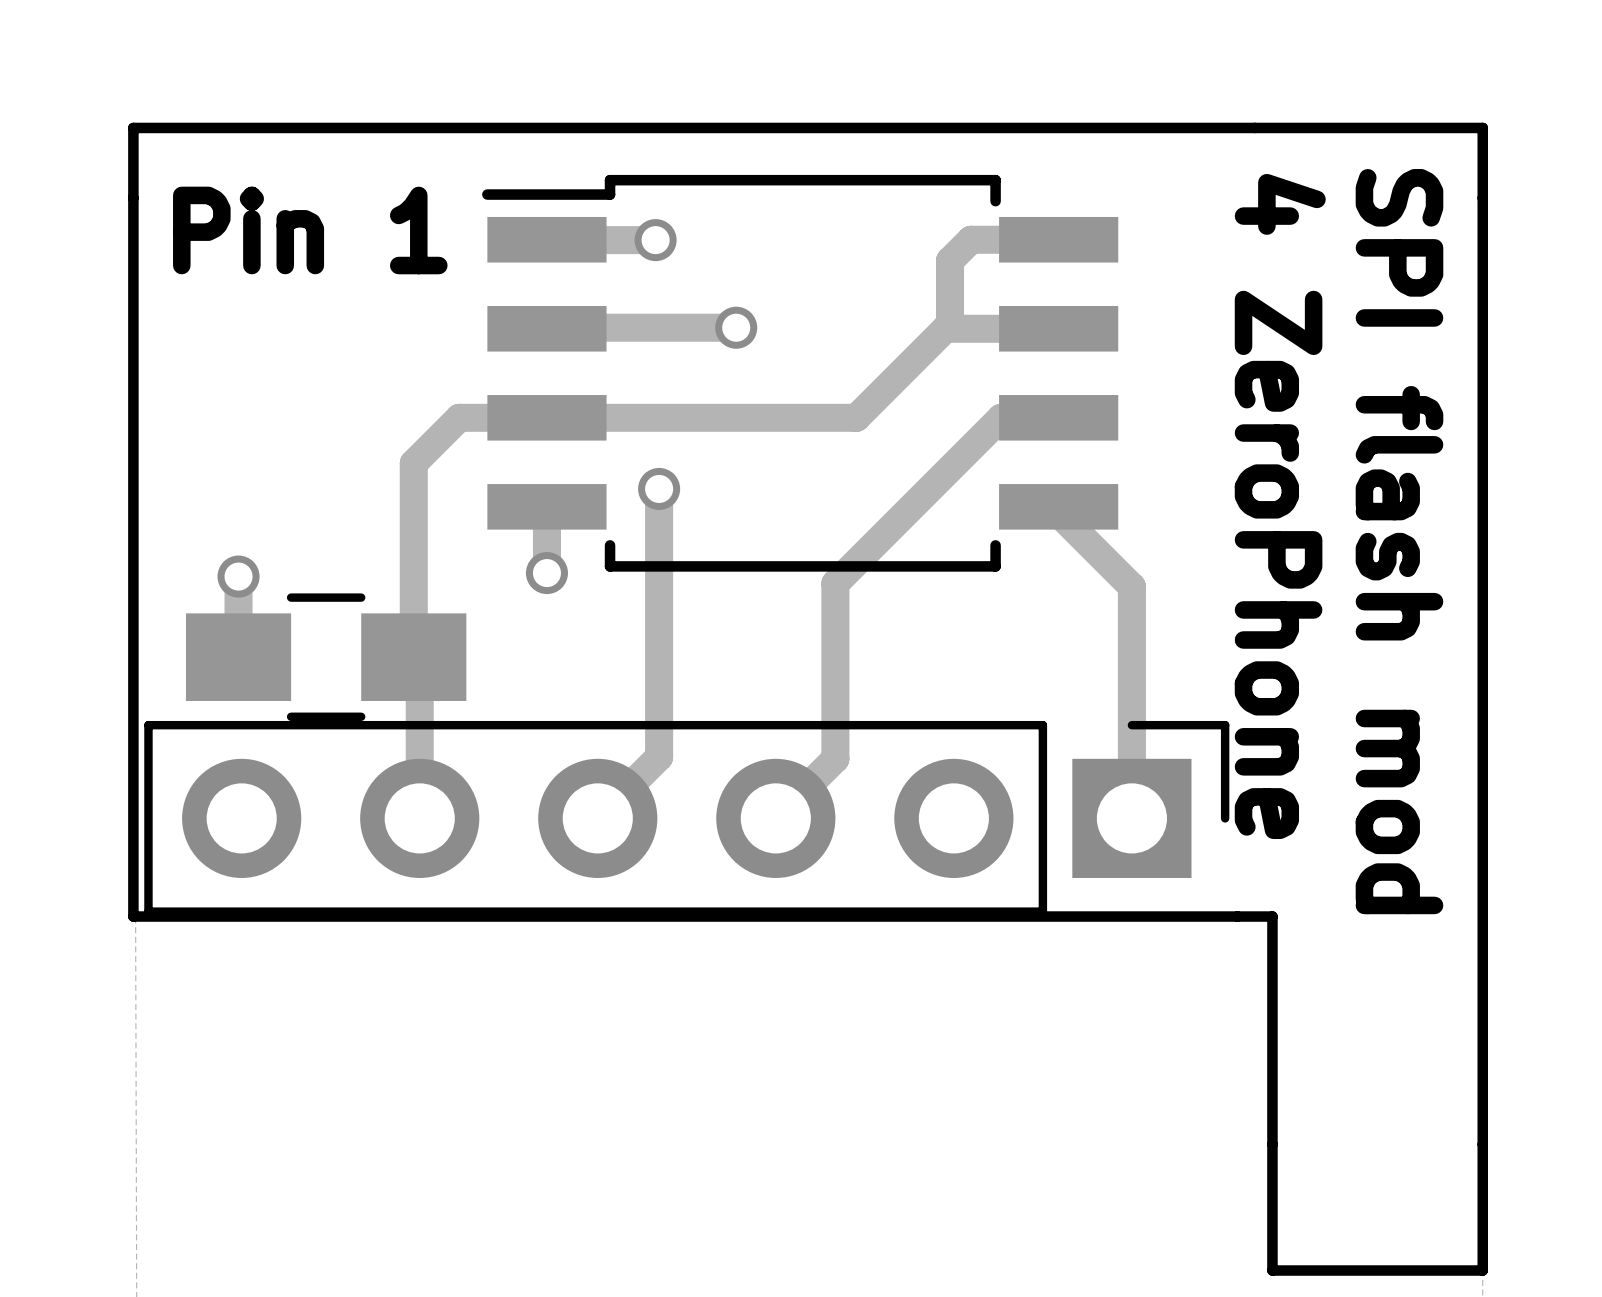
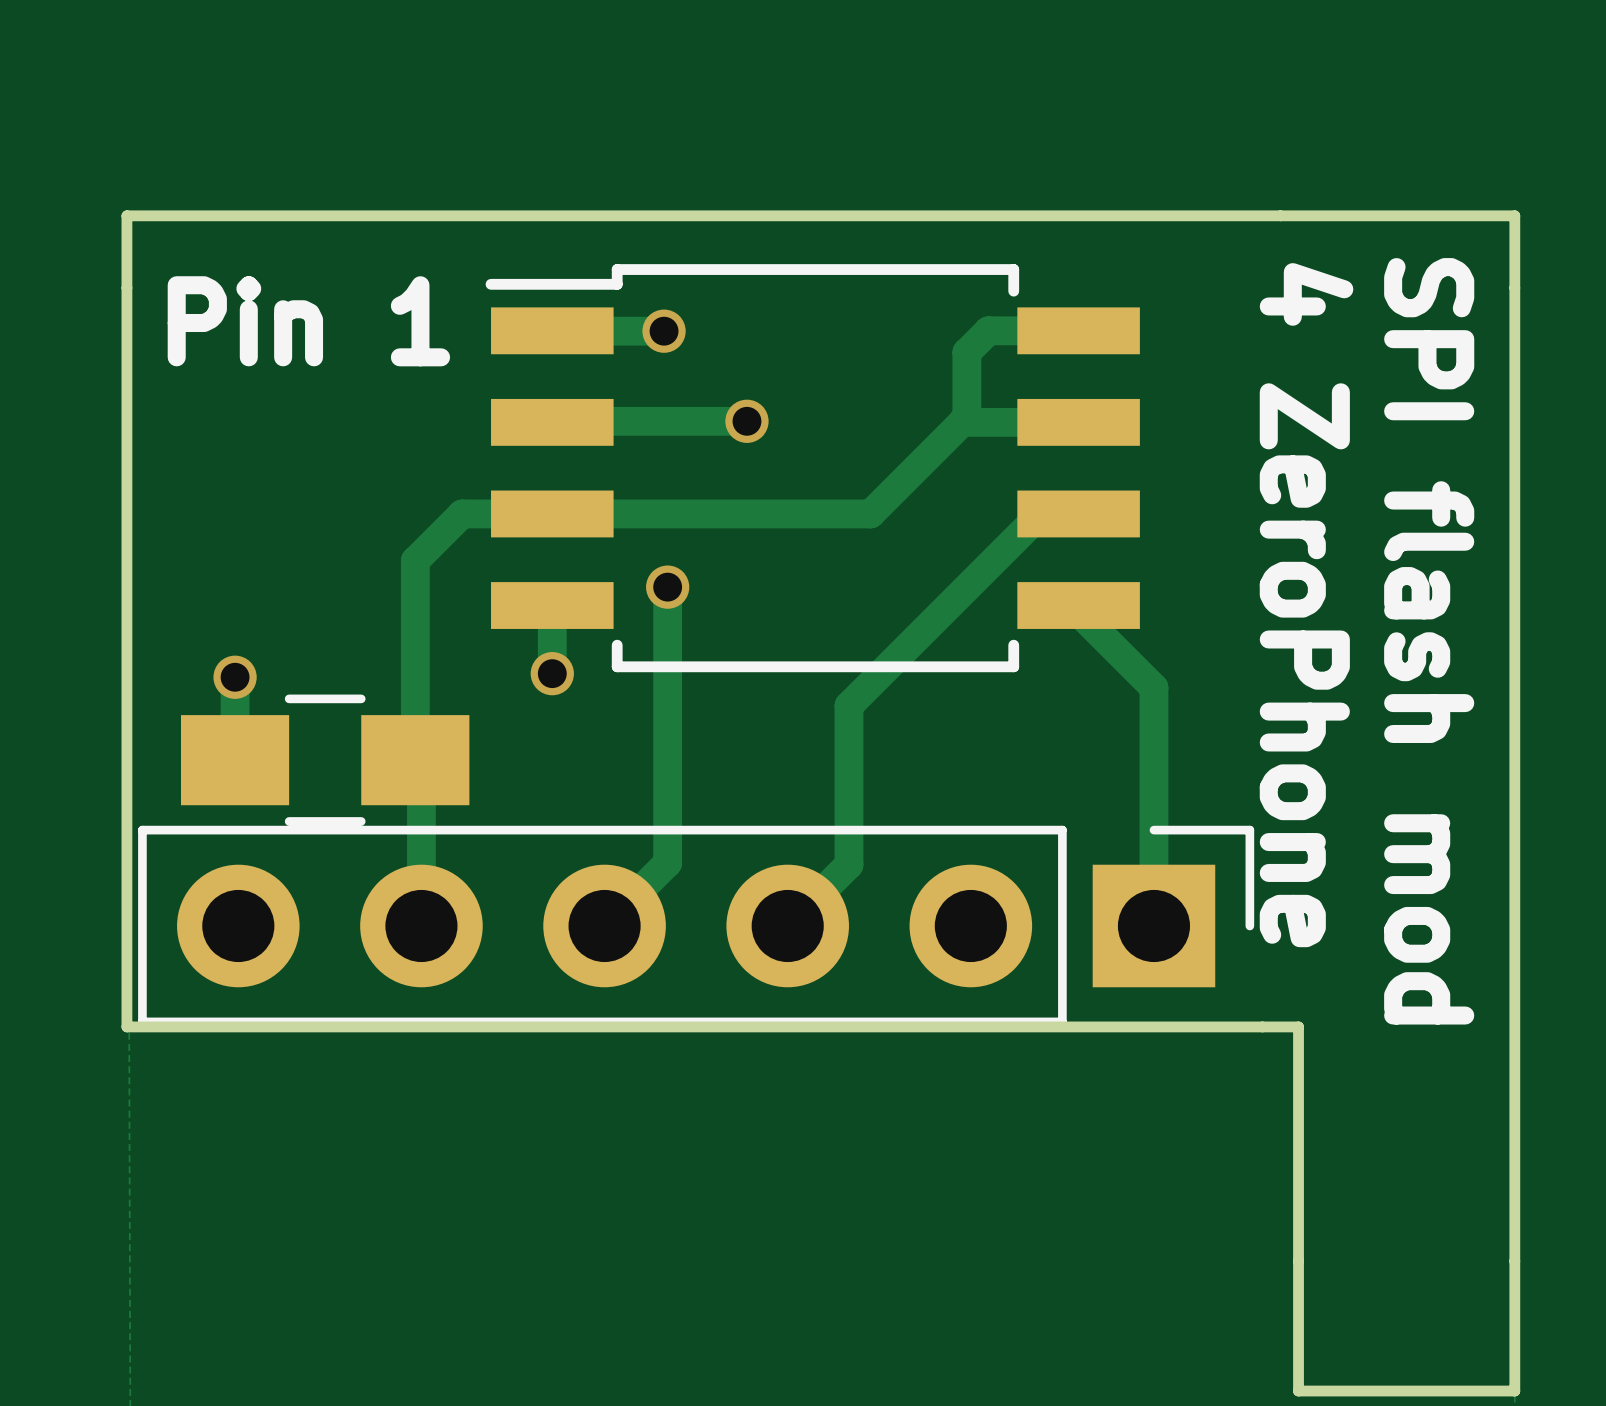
track: (1021, 417) (1001, 417) (835, 583) (835, 604) -> (1040, 513) (848, 705)

